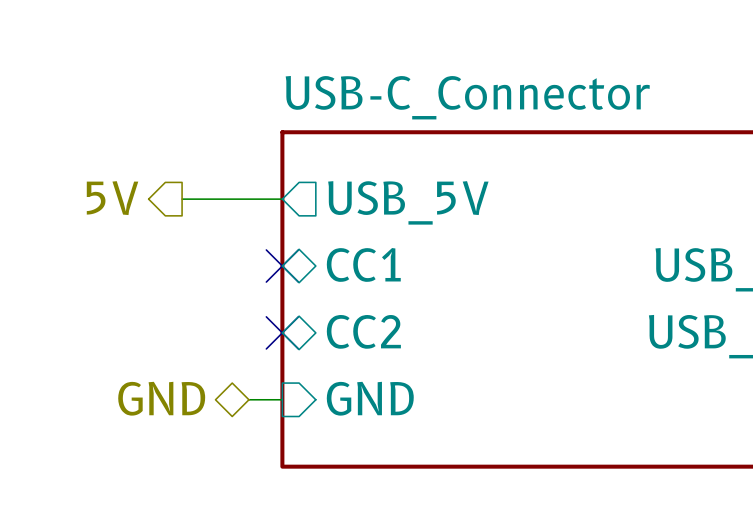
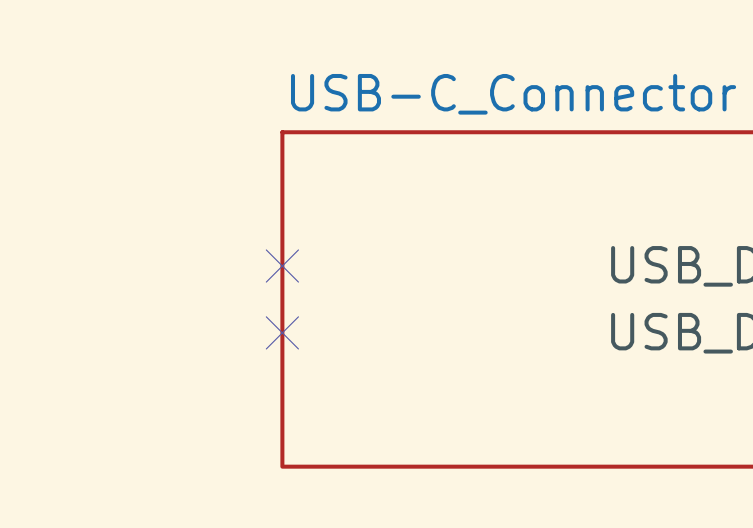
hierarchical label: 5V (112, 198) -> none
wire: (182, 199) (282, 199) -> none
sheet pin: USB_5V (408, 202) -> none
sheet pin: CC1 (363, 264) -> none
sheet pin: CC2 (363, 331) -> none
hierarchical label: GND (161, 398) -> none
sheet pin: GND (370, 398) -> none
wire: (248, 399) (282, 399) -> none

